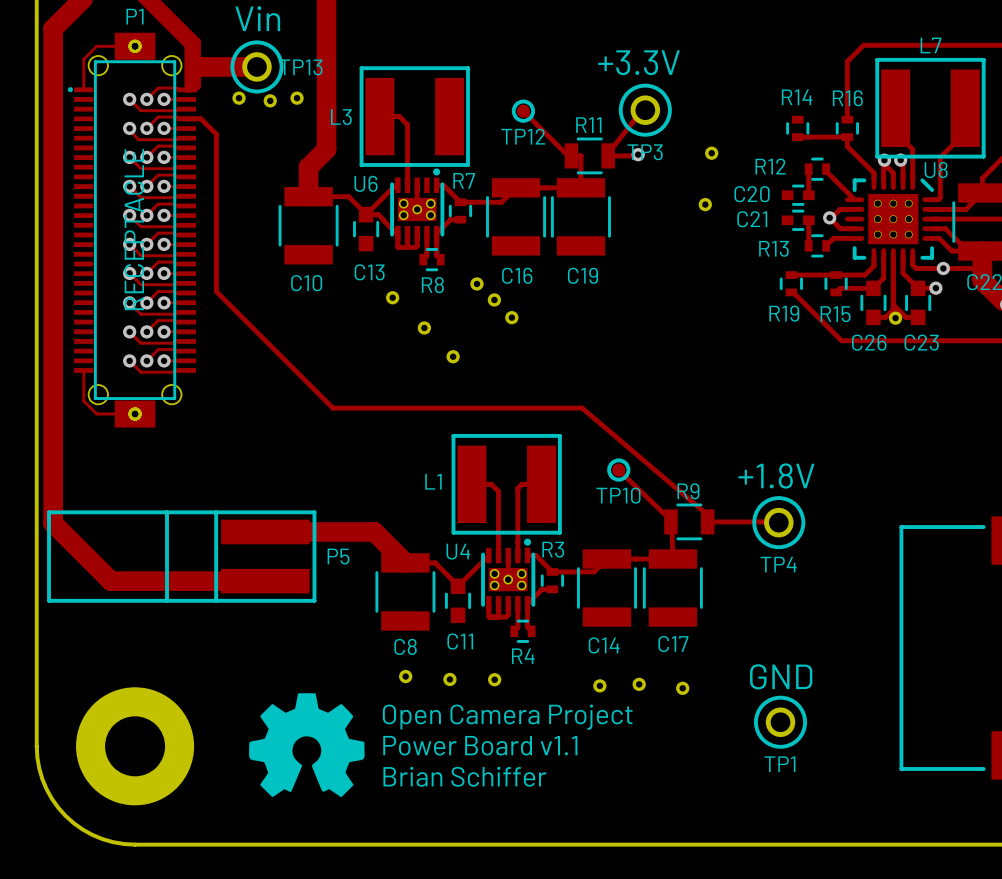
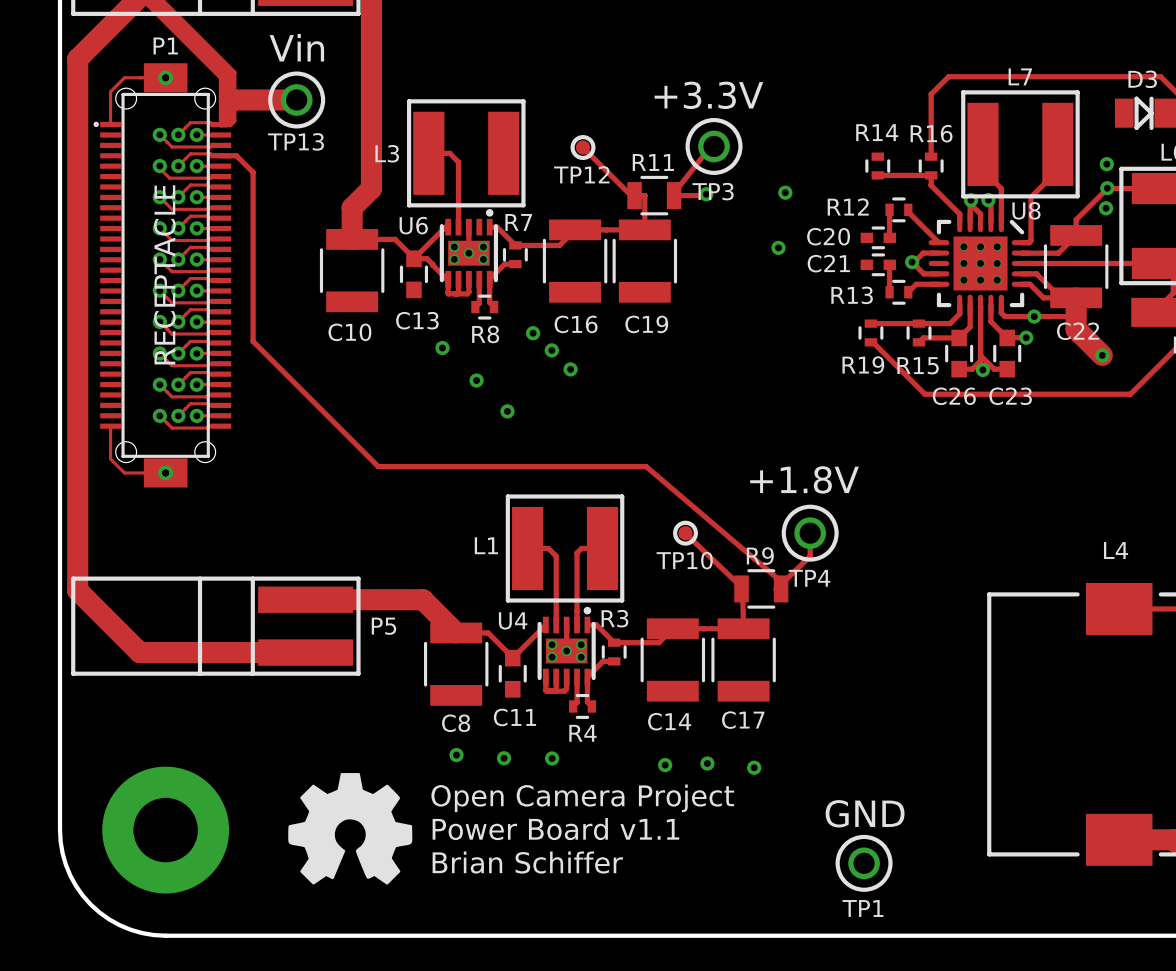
TP13 name position: TP13 (300, 67) -> TP13 (295, 141)
part: (239, 98) -> none
part: (297, 98) -> none
part: (270, 100) -> none
track: none -> (810, 533) (810, 556) (776, 589)
text position: +1.8V (776, 475) -> +1.8V (804, 479)
track: (707, 521) (778, 522) -> none
TP4 position: (778, 522) -> (810, 533)
text position: GND (781, 676) -> GND (865, 813)
TP1 position: (780, 722) -> (864, 863)

